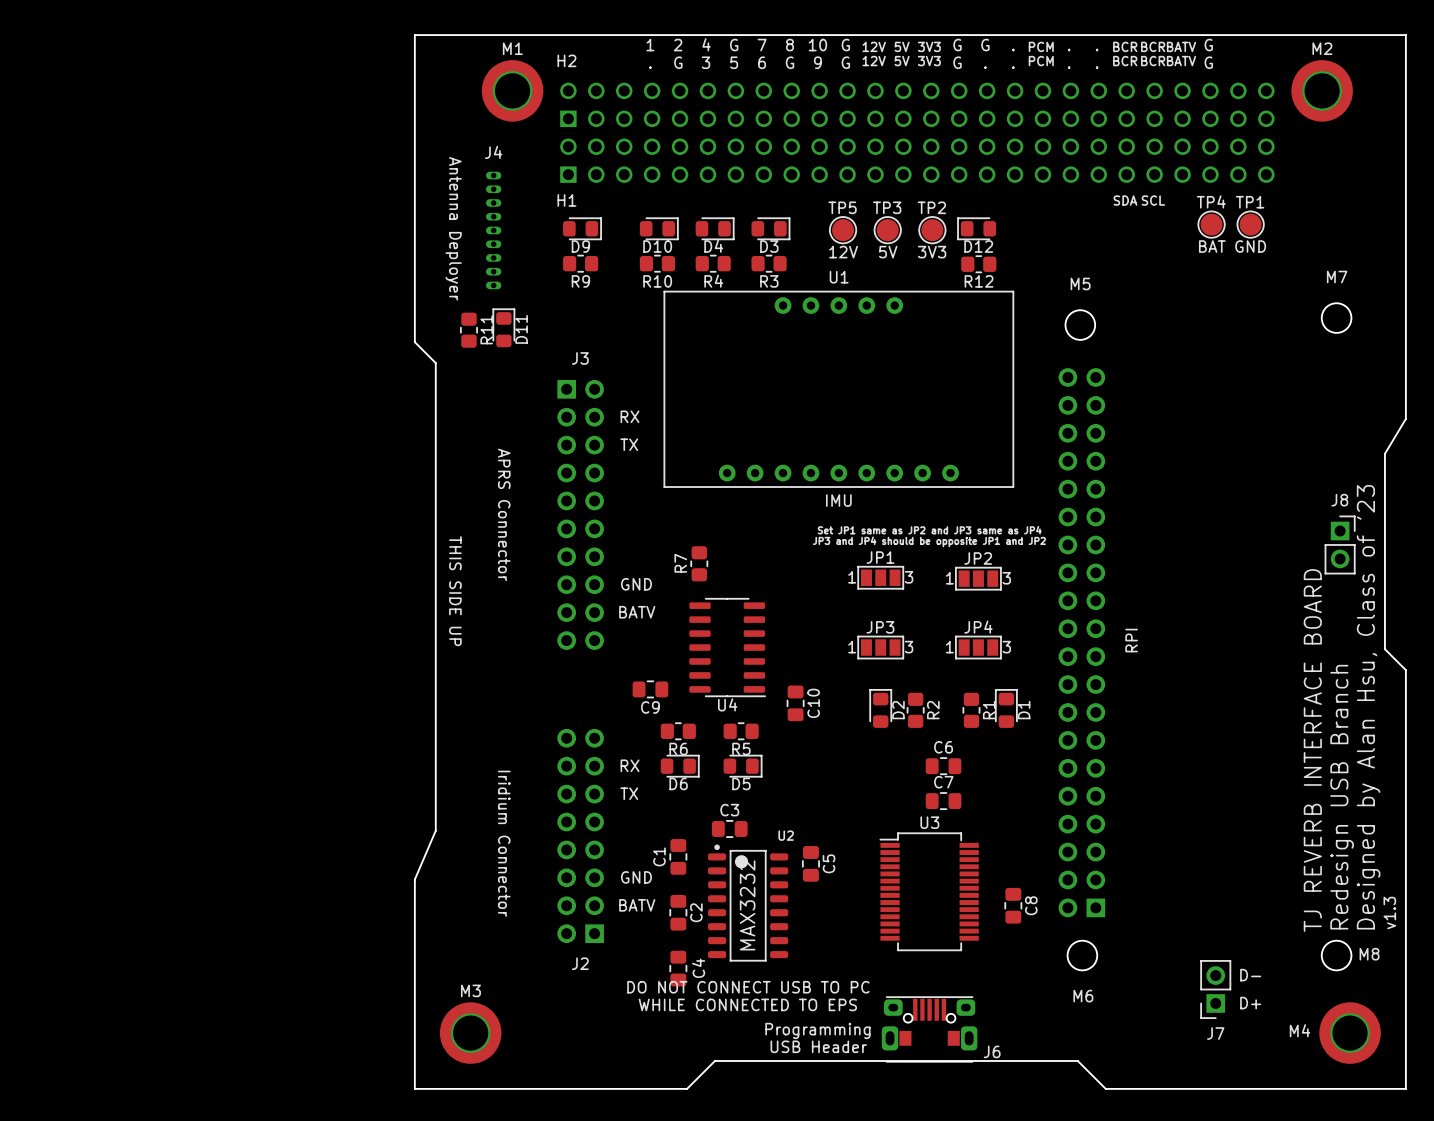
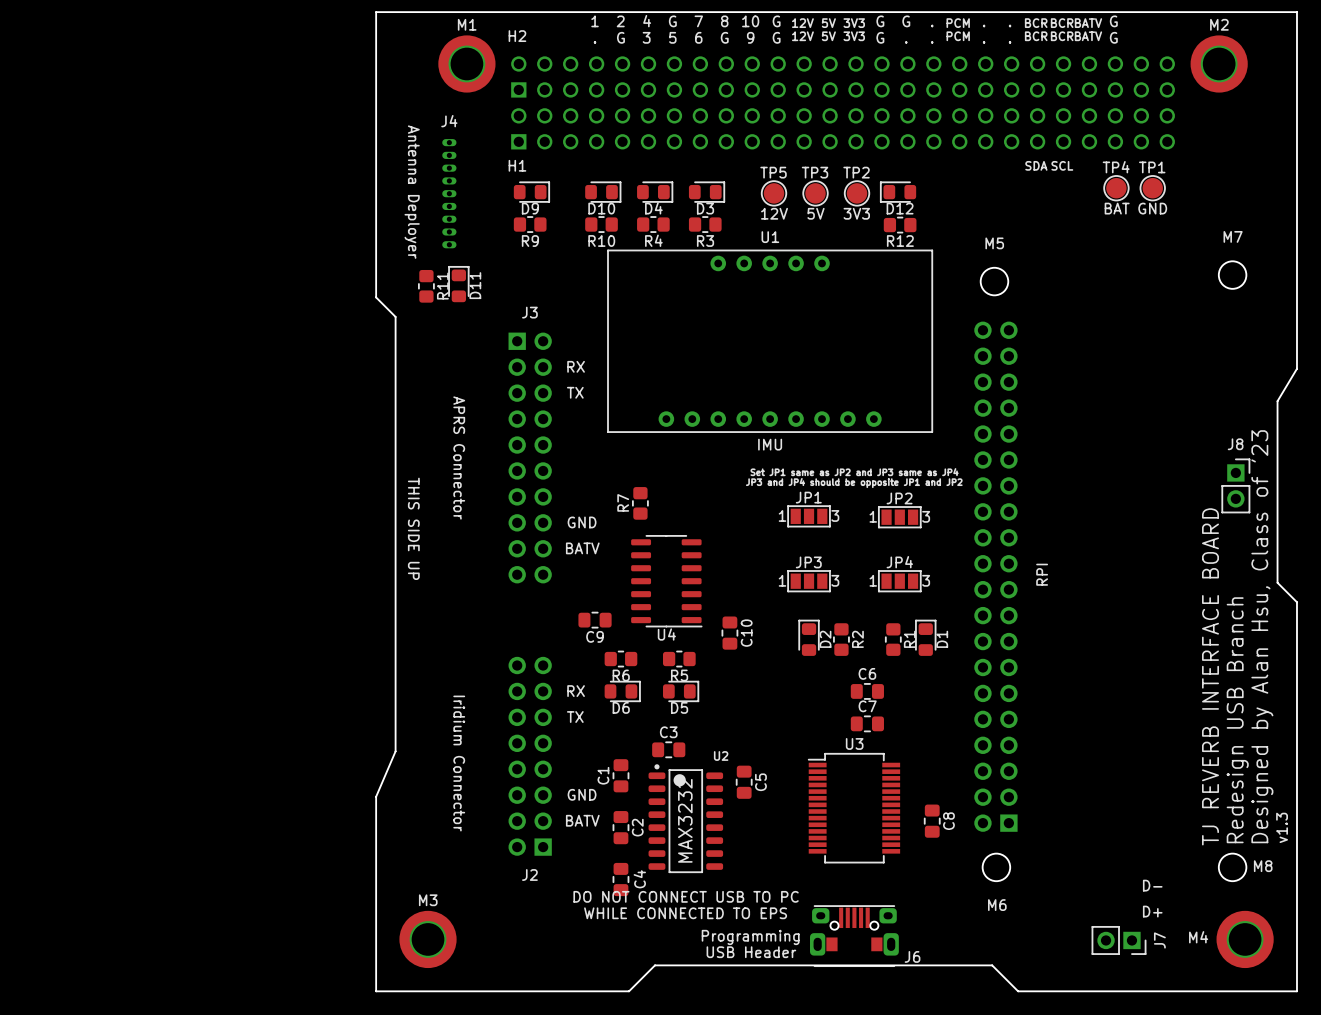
J7 rotation: 0° (1215, 989) -> 90° counterclockwise (1119, 940)
J7 position: (1215, 989) -> (1119, 940)

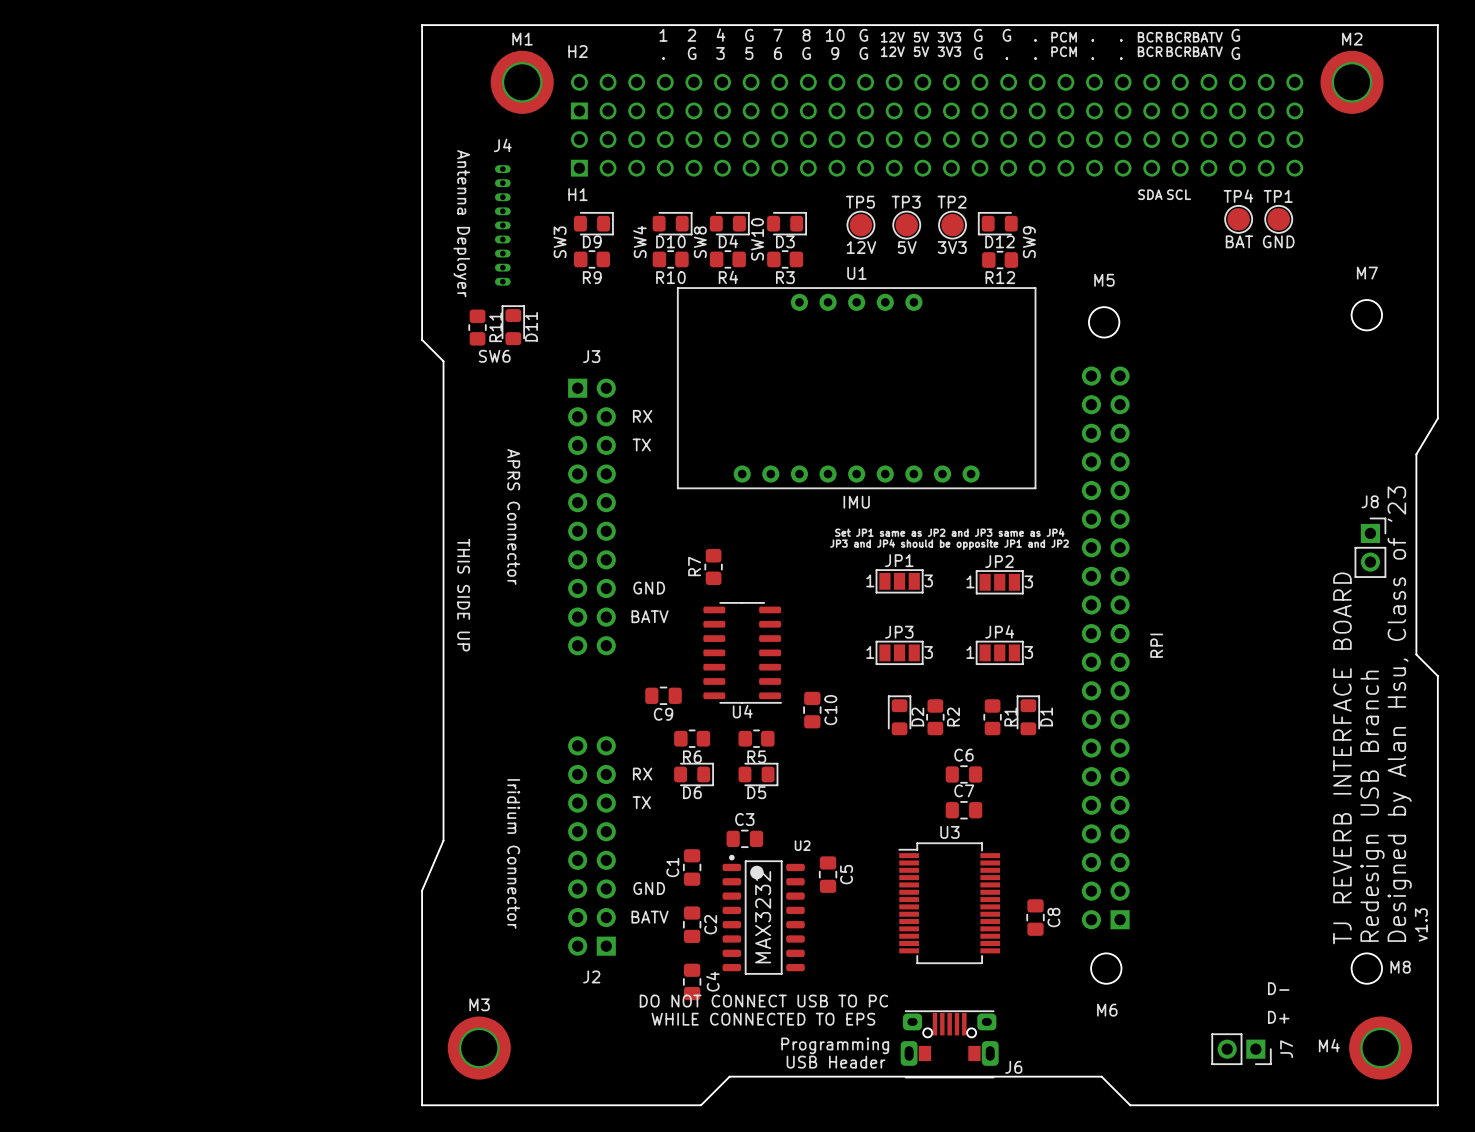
text: none -> SW10 (757, 239)
text: none -> SW3 (560, 242)
text: none -> SW4 (639, 241)
text: none -> SW8 (700, 242)
text: none -> SW9 (1029, 242)
text: none -> SW6 (494, 356)

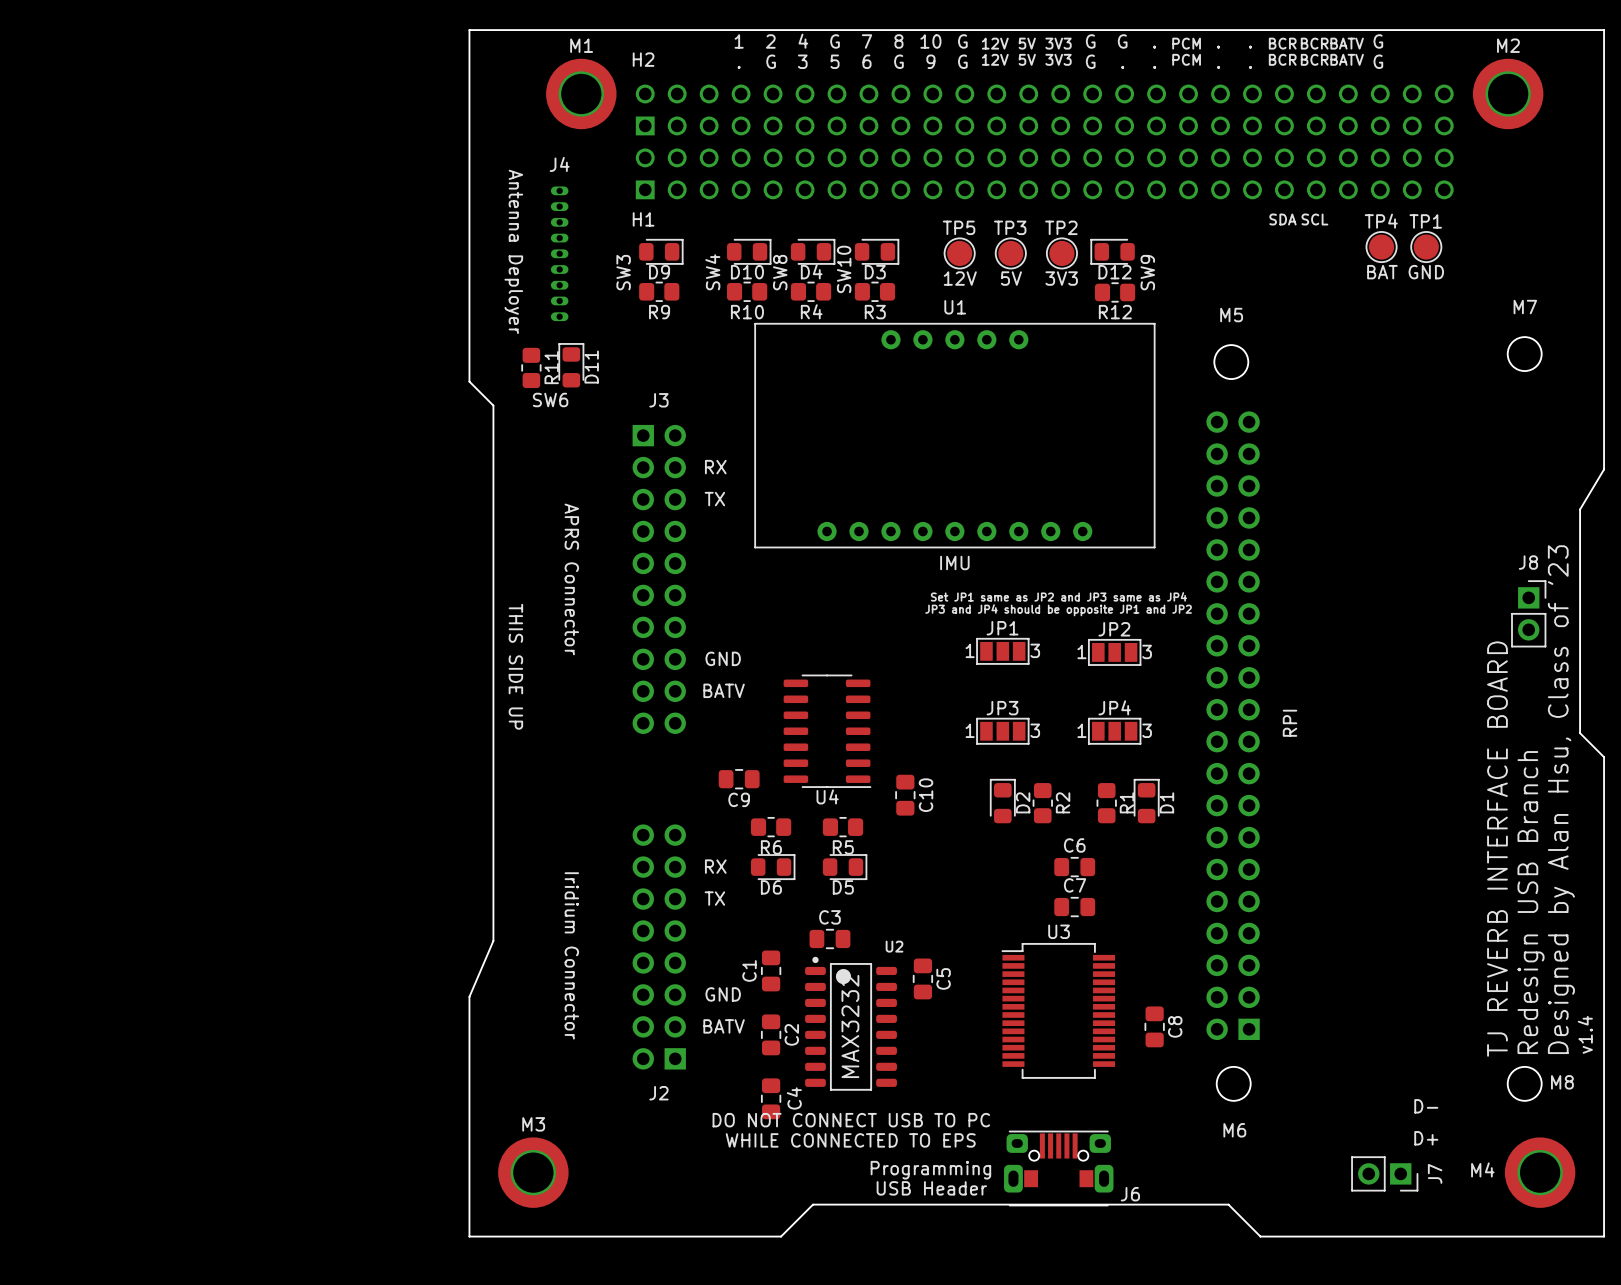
R7: (713, 567) -> none
text: v1.3 (1421, 924) -> v1.4 (1585, 1034)

